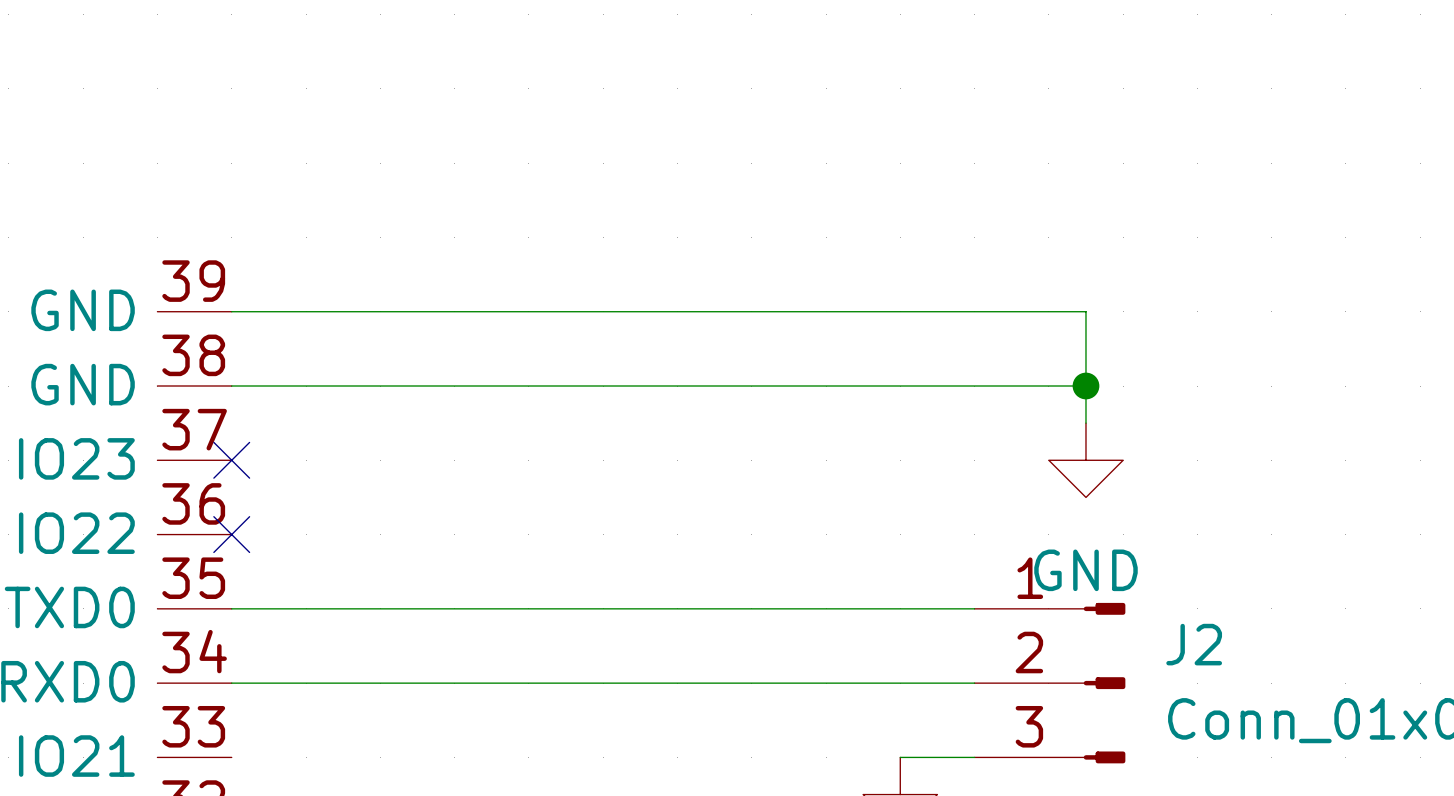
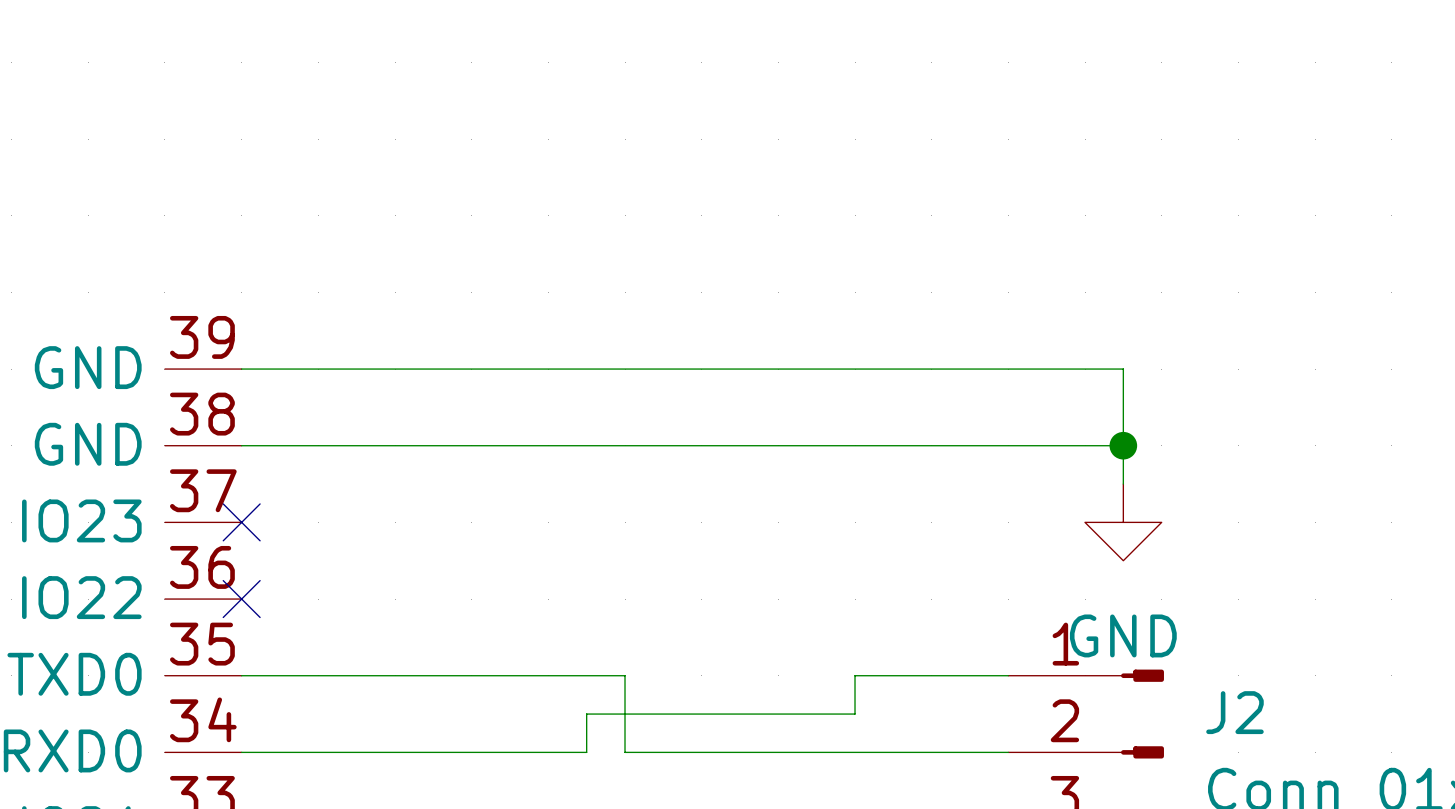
wire: (603, 608) (826, 608) -> (586, 752) (586, 714) (855, 714) (855, 675)
wire: (566, 683) (603, 683) -> (625, 675) (625, 752)

